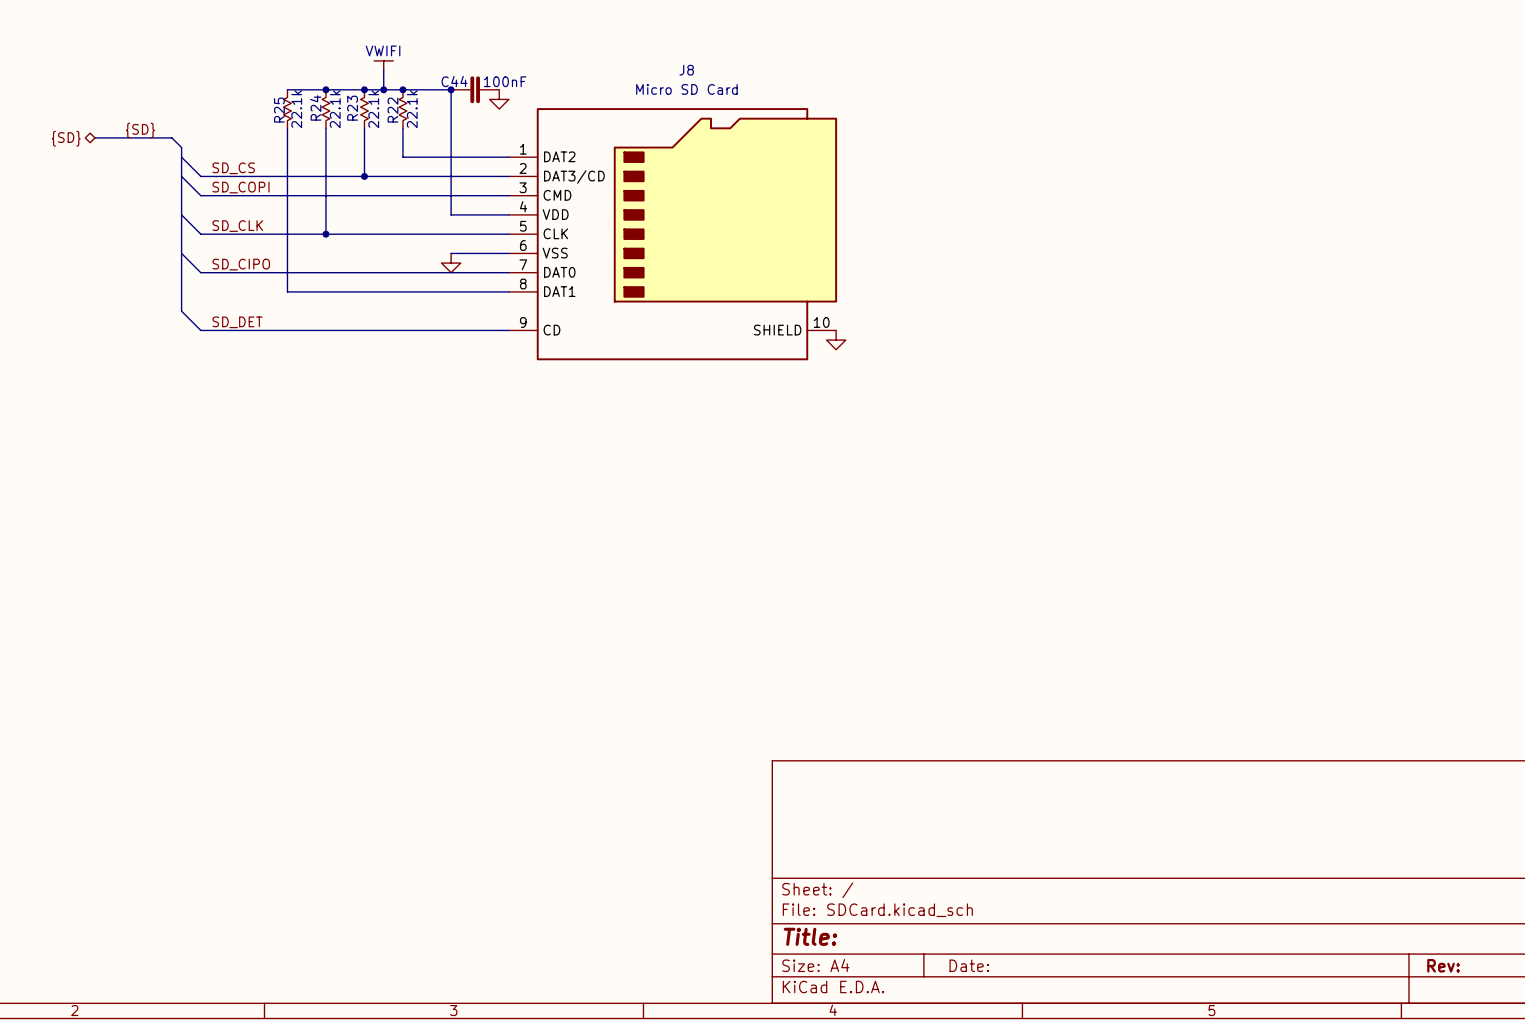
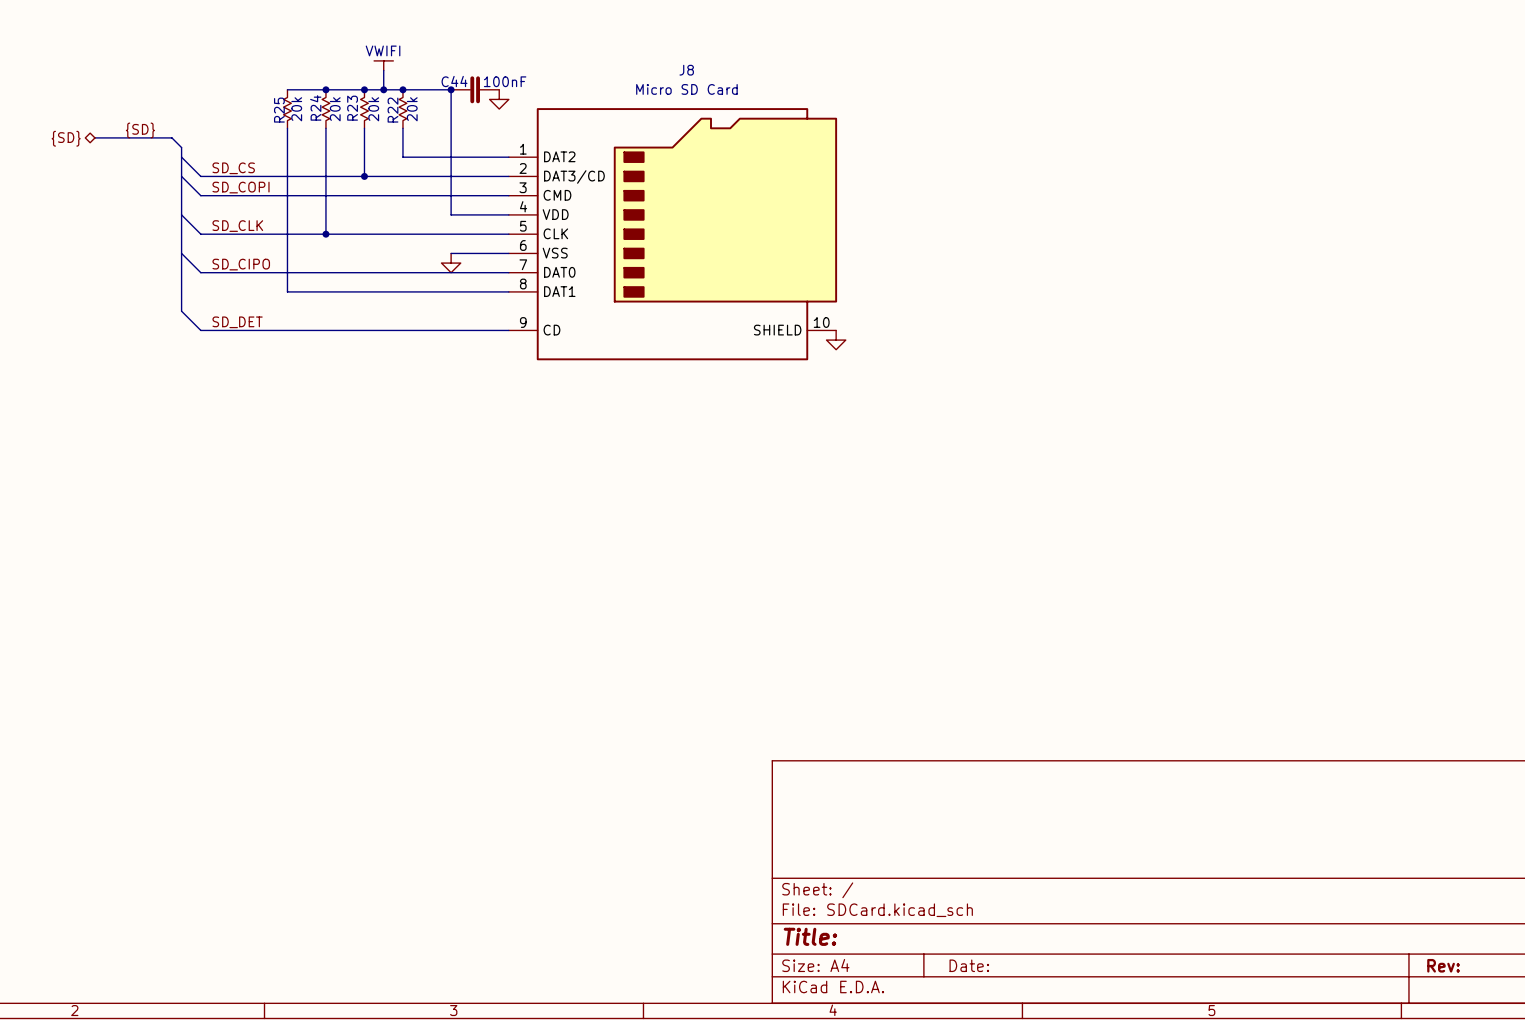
R25 text: 22.1k (296, 109) -> 20k (296, 109)
R24 text: 22.1k (335, 109) -> 20k (335, 109)
R23 text: 22.1k (373, 109) -> 20k (373, 109)
R22 text: 22.1k (412, 109) -> 20k (412, 109)

